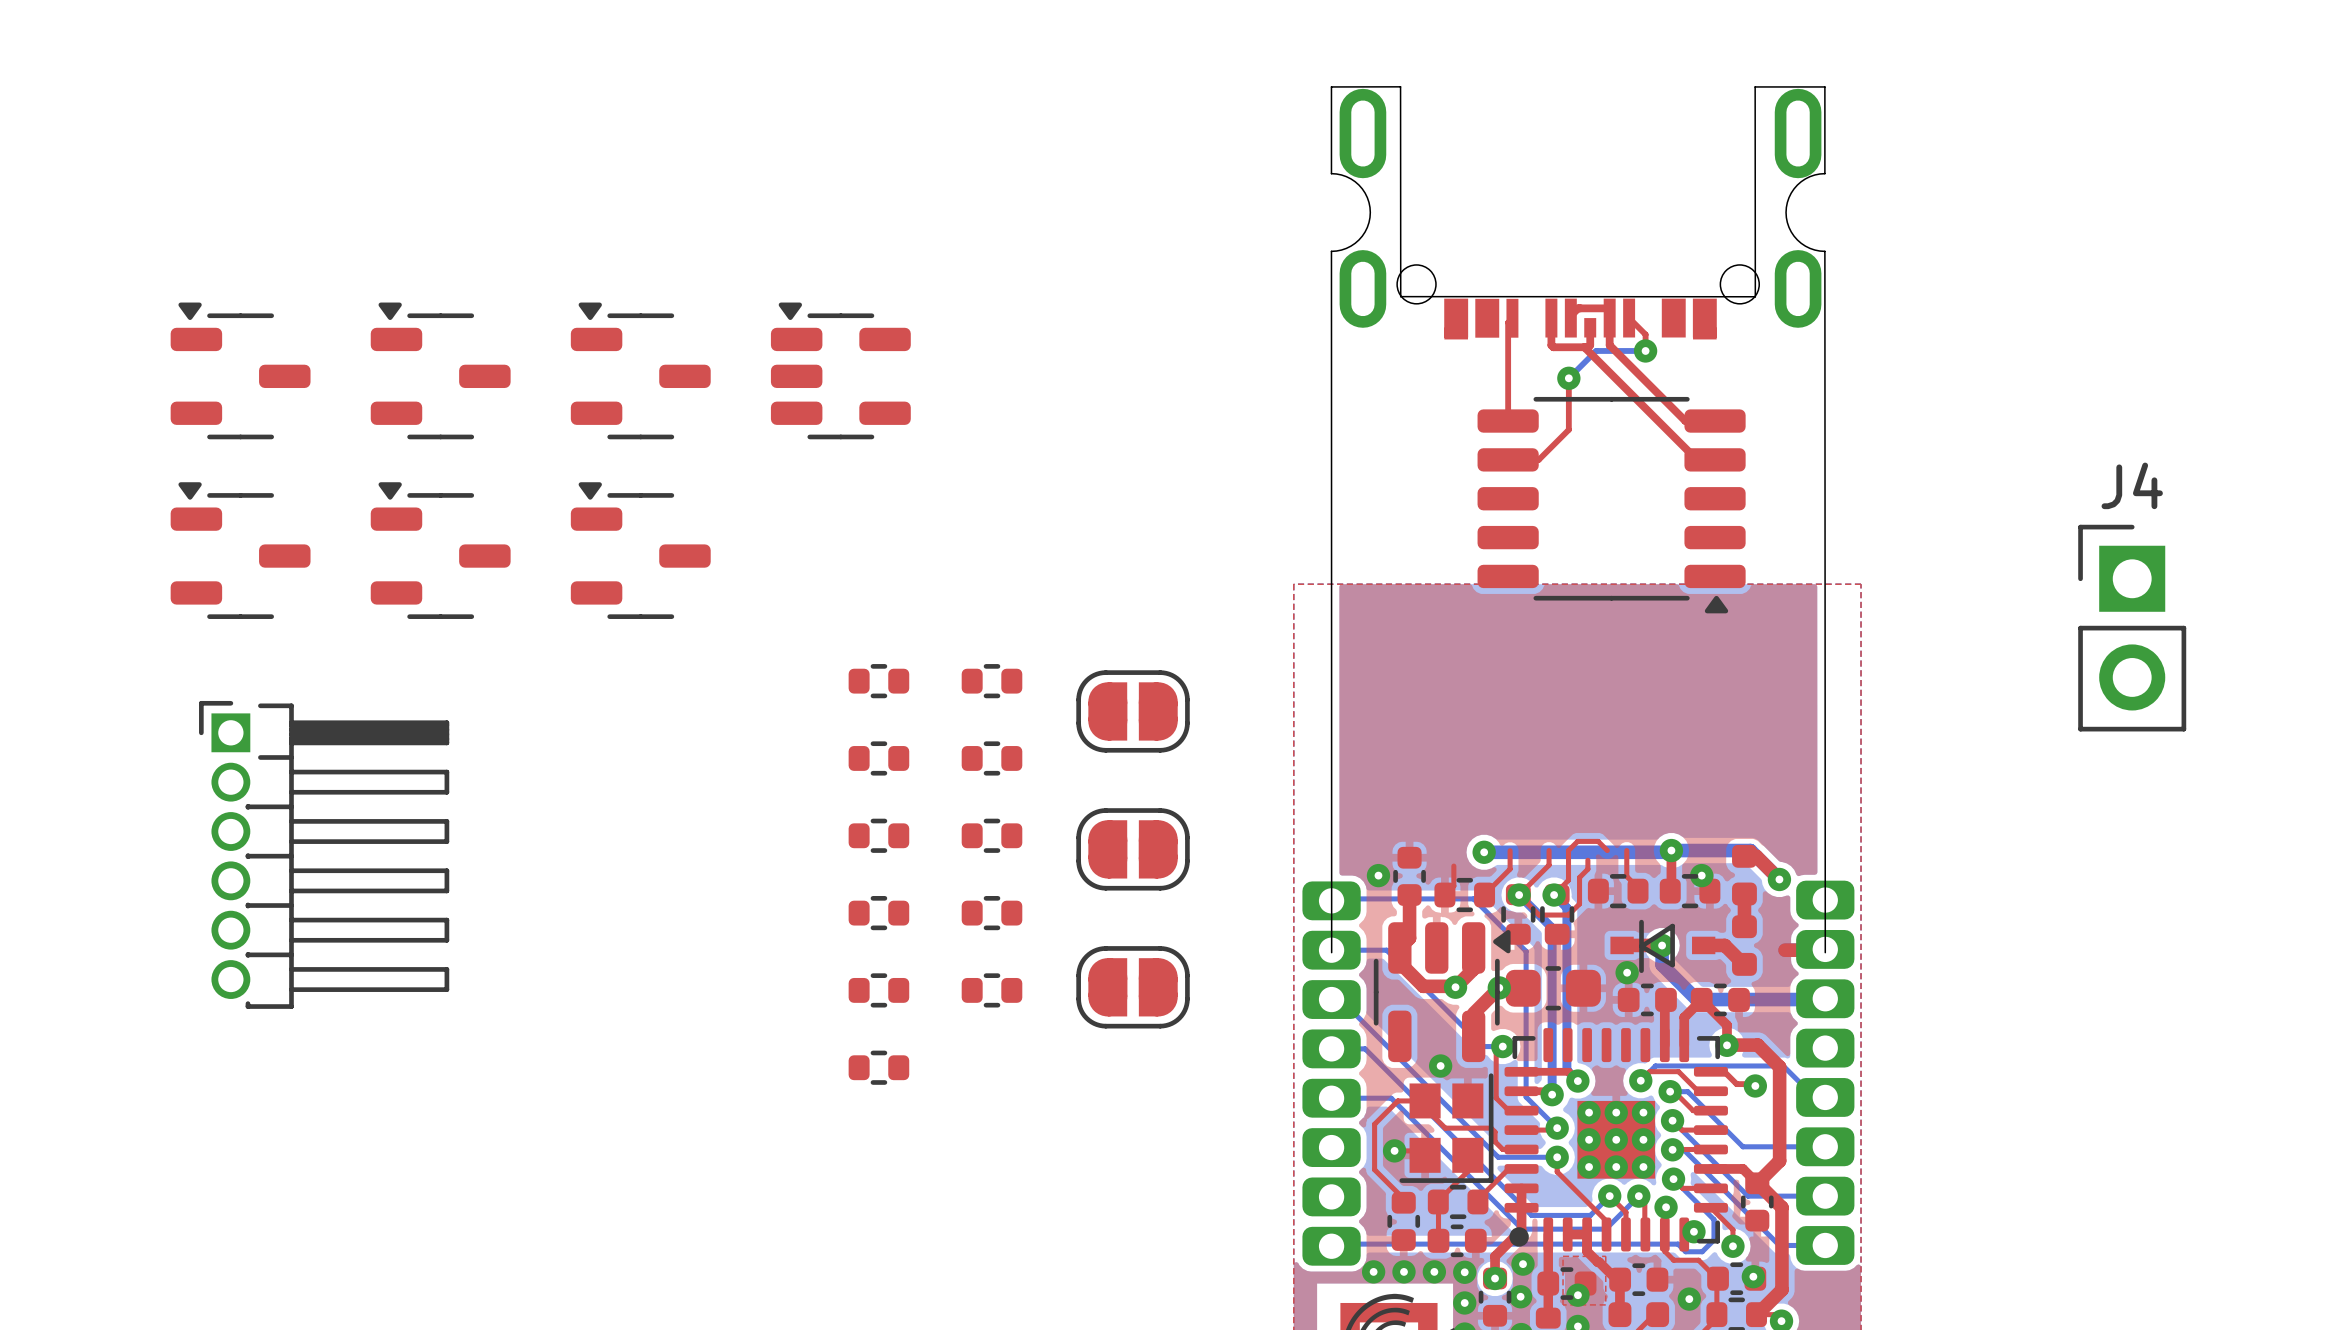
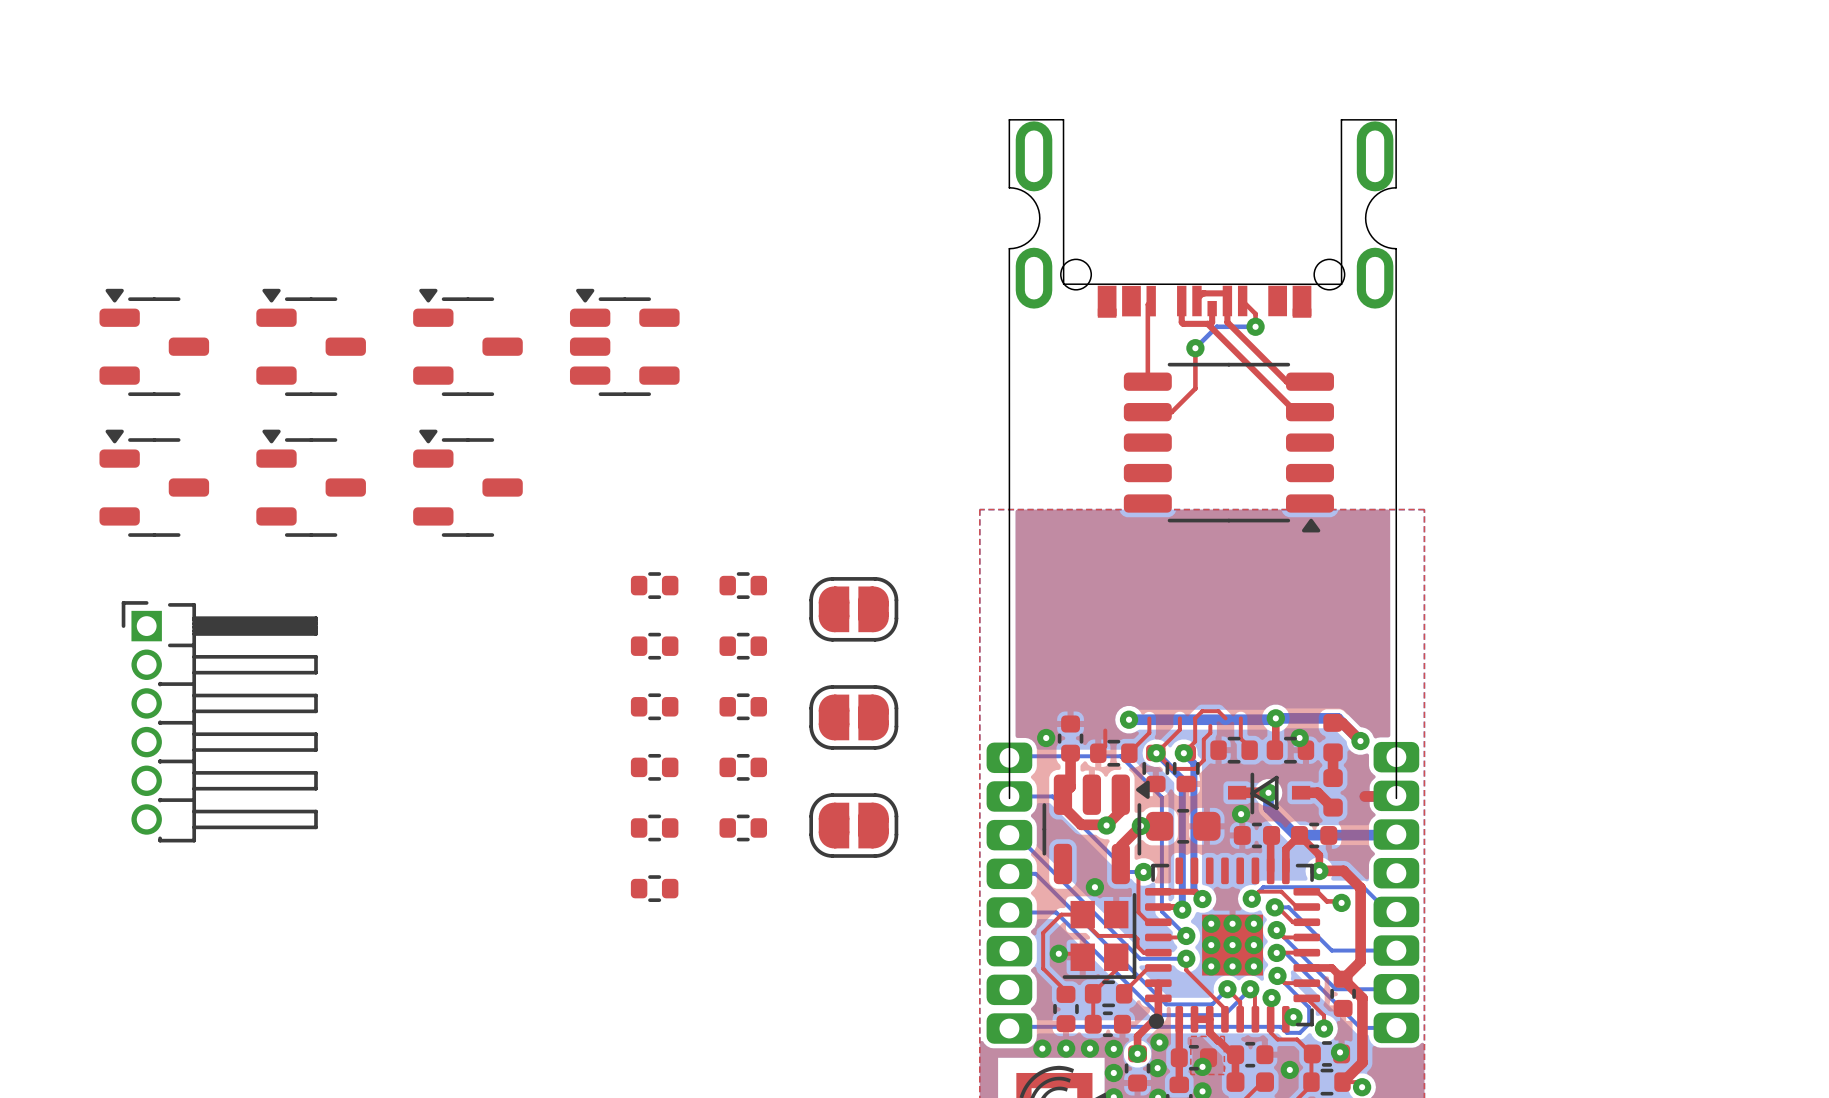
J4: (2132, 628) -> none

